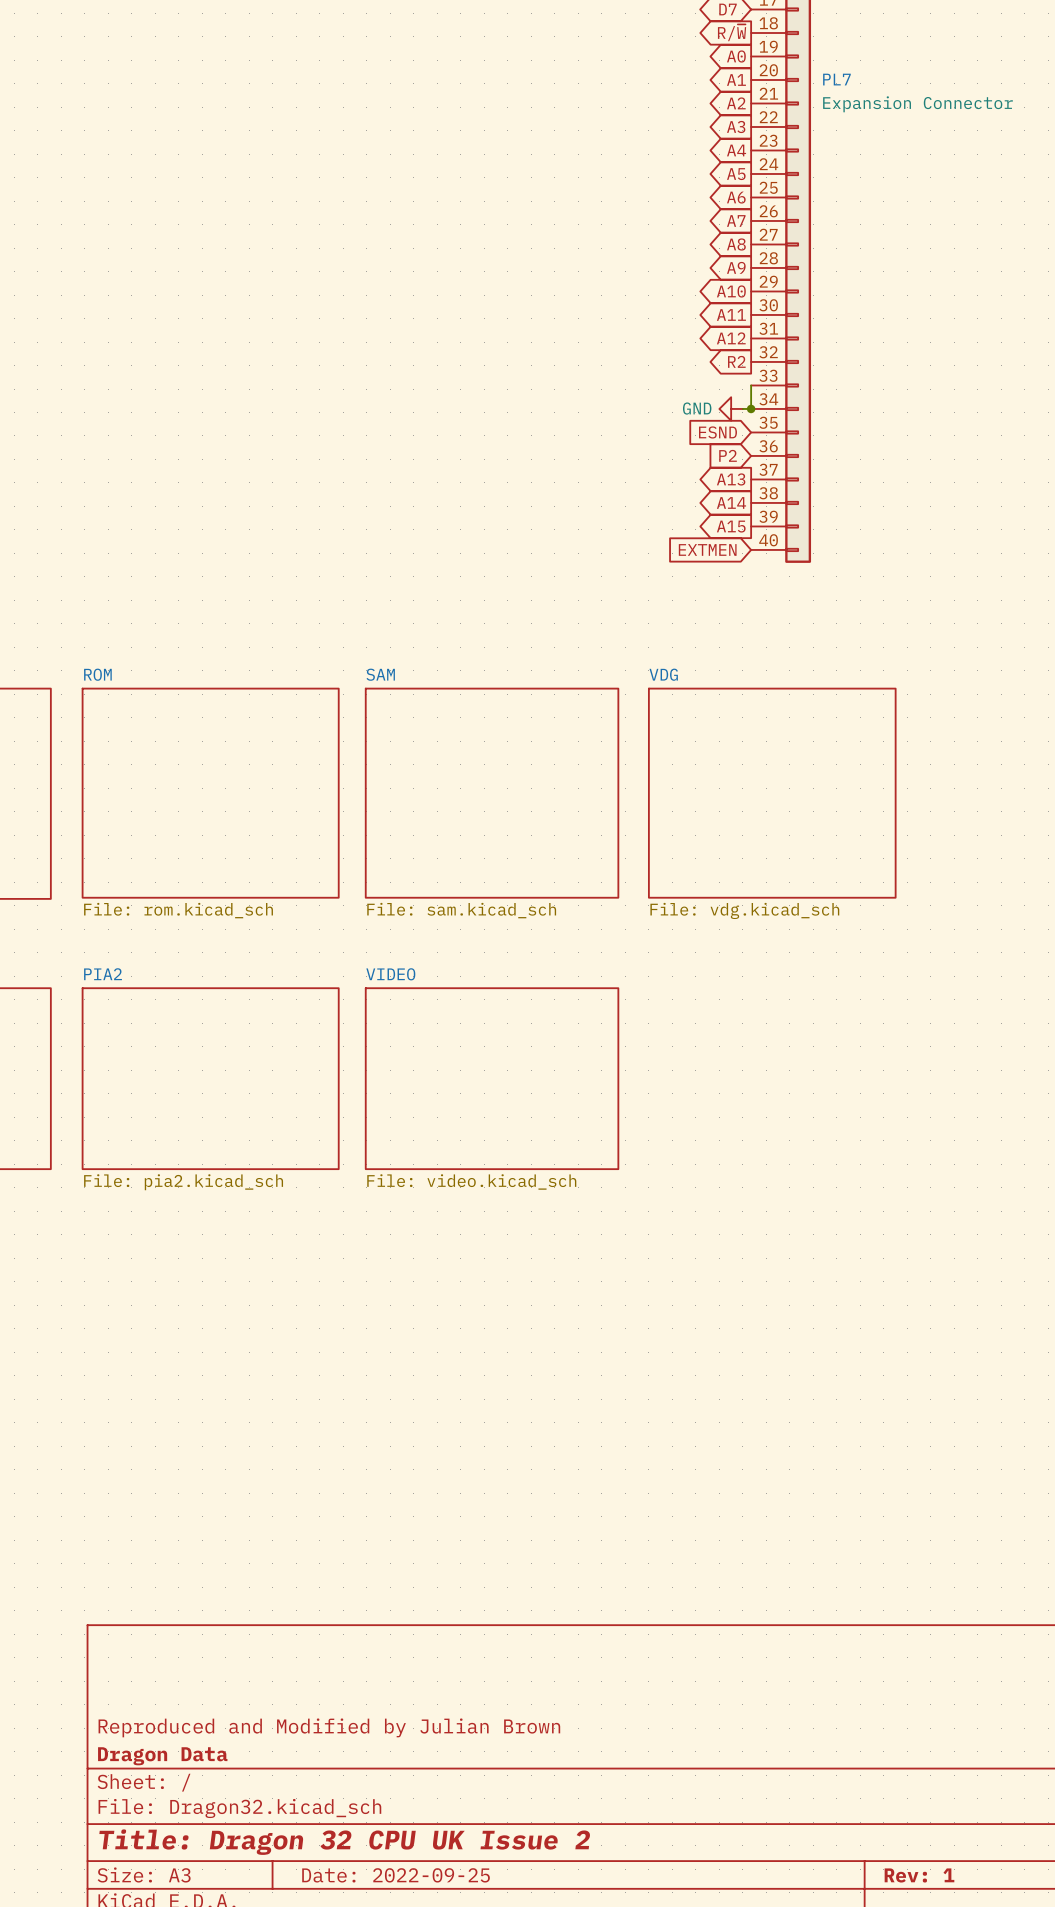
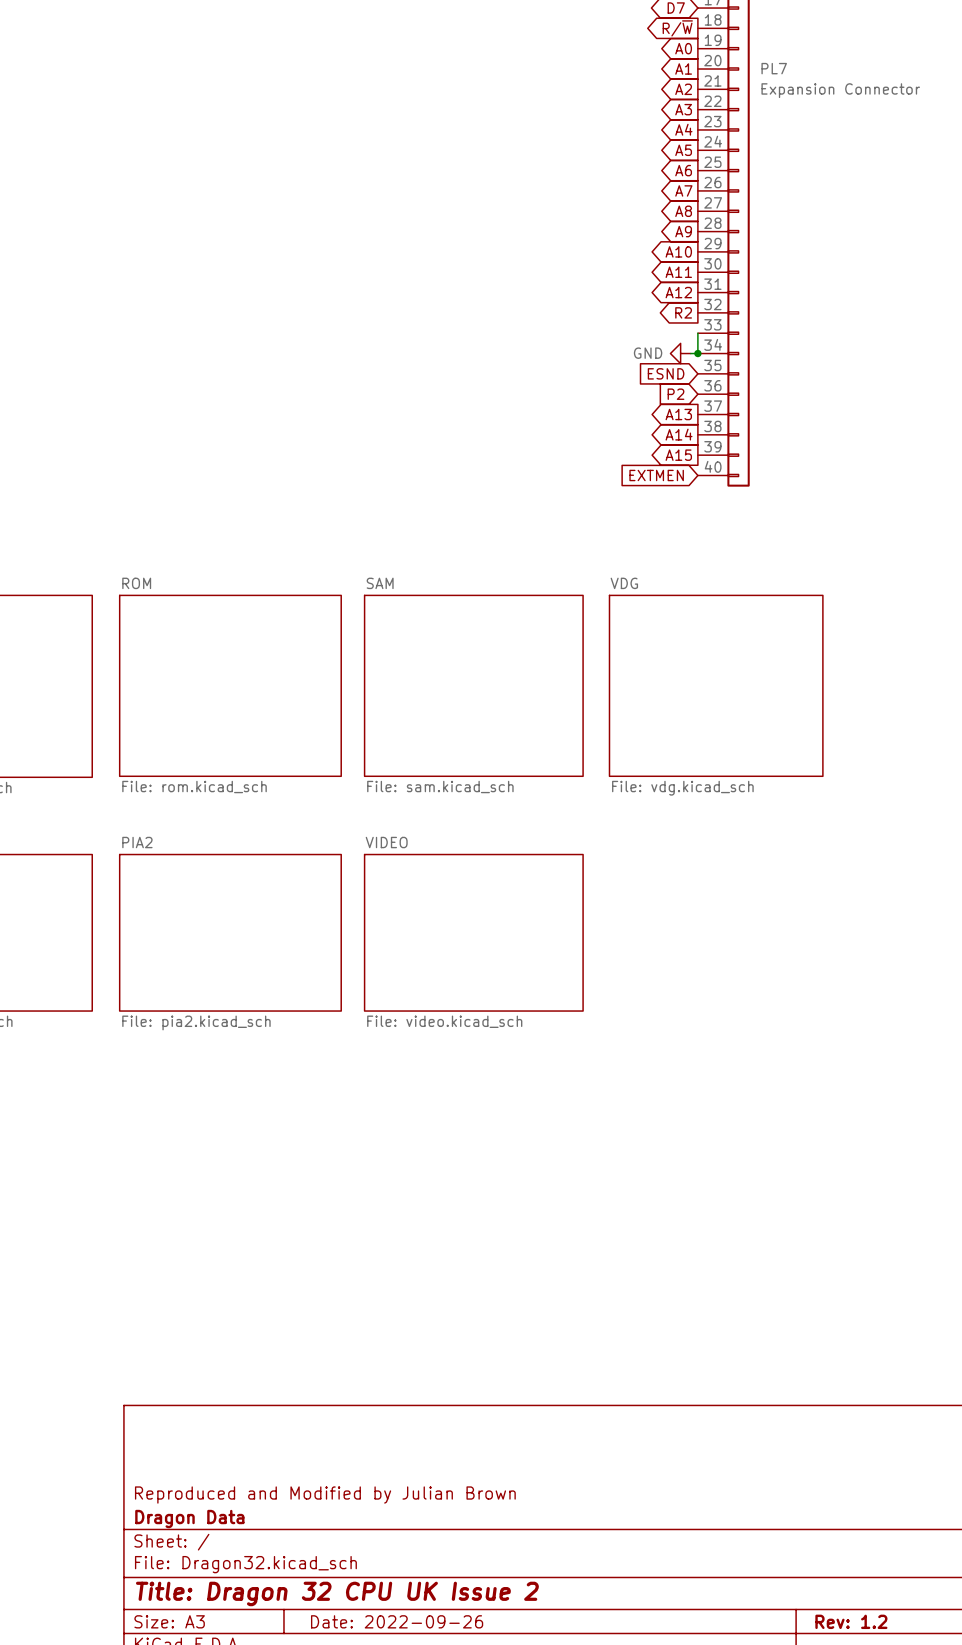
title block: Date: 2022-09-25 (396, 1875) -> Date: 2022-09-26 (397, 1621)
title block: Rev: 1 (919, 1875) -> Rev: 1.2 (851, 1621)

